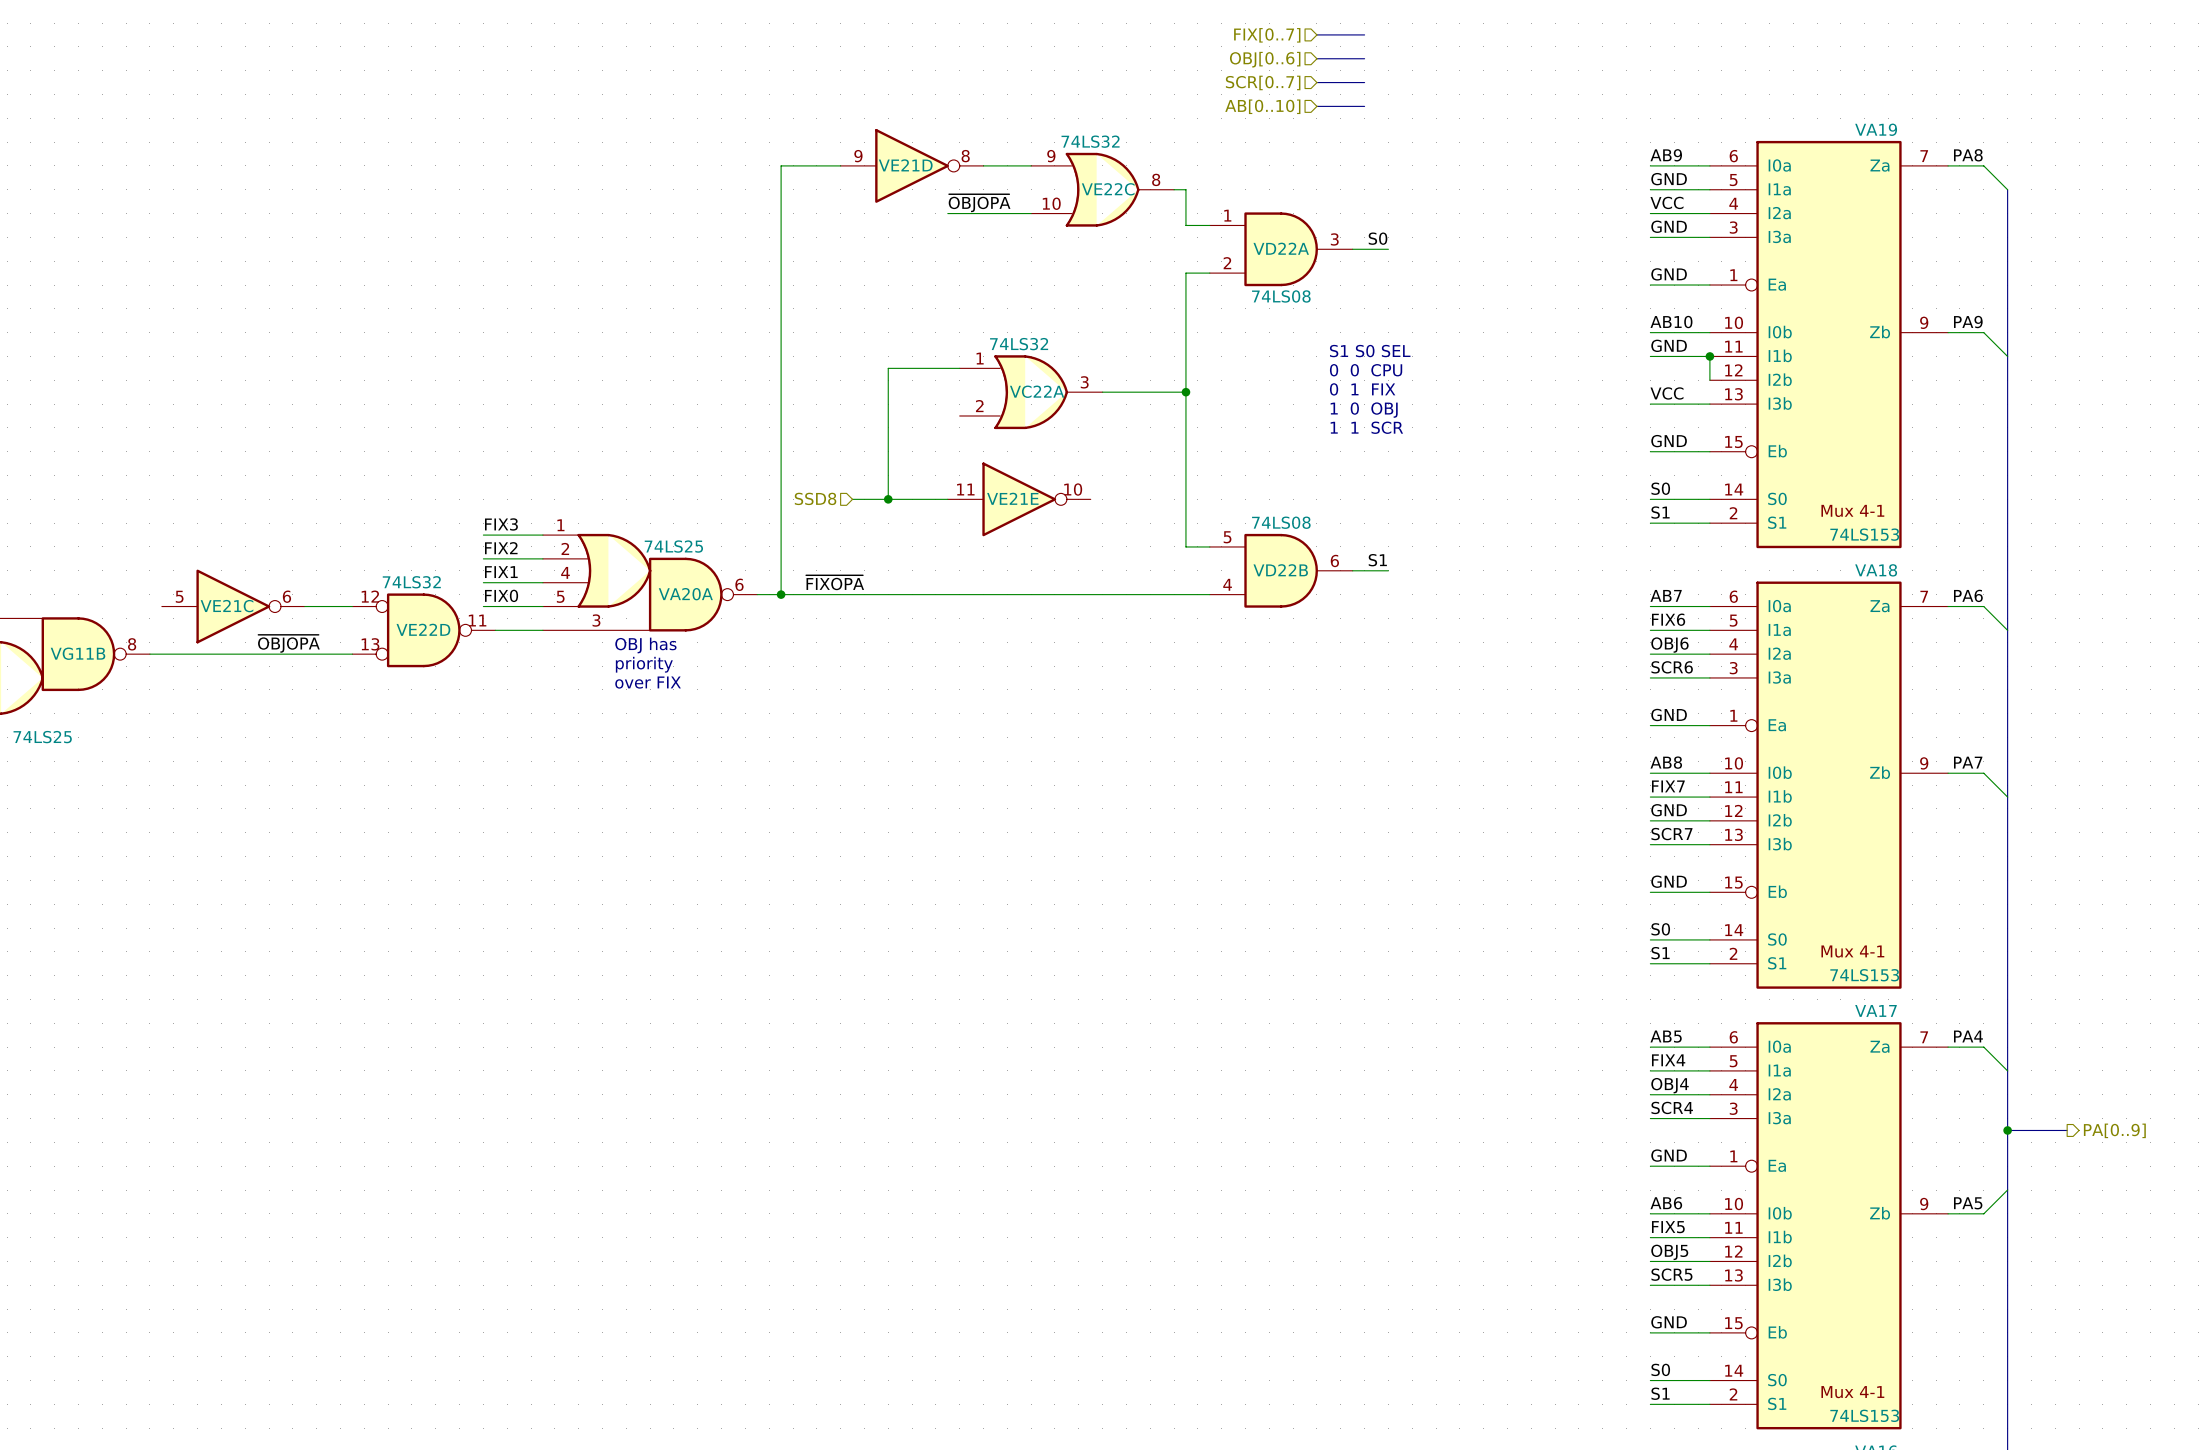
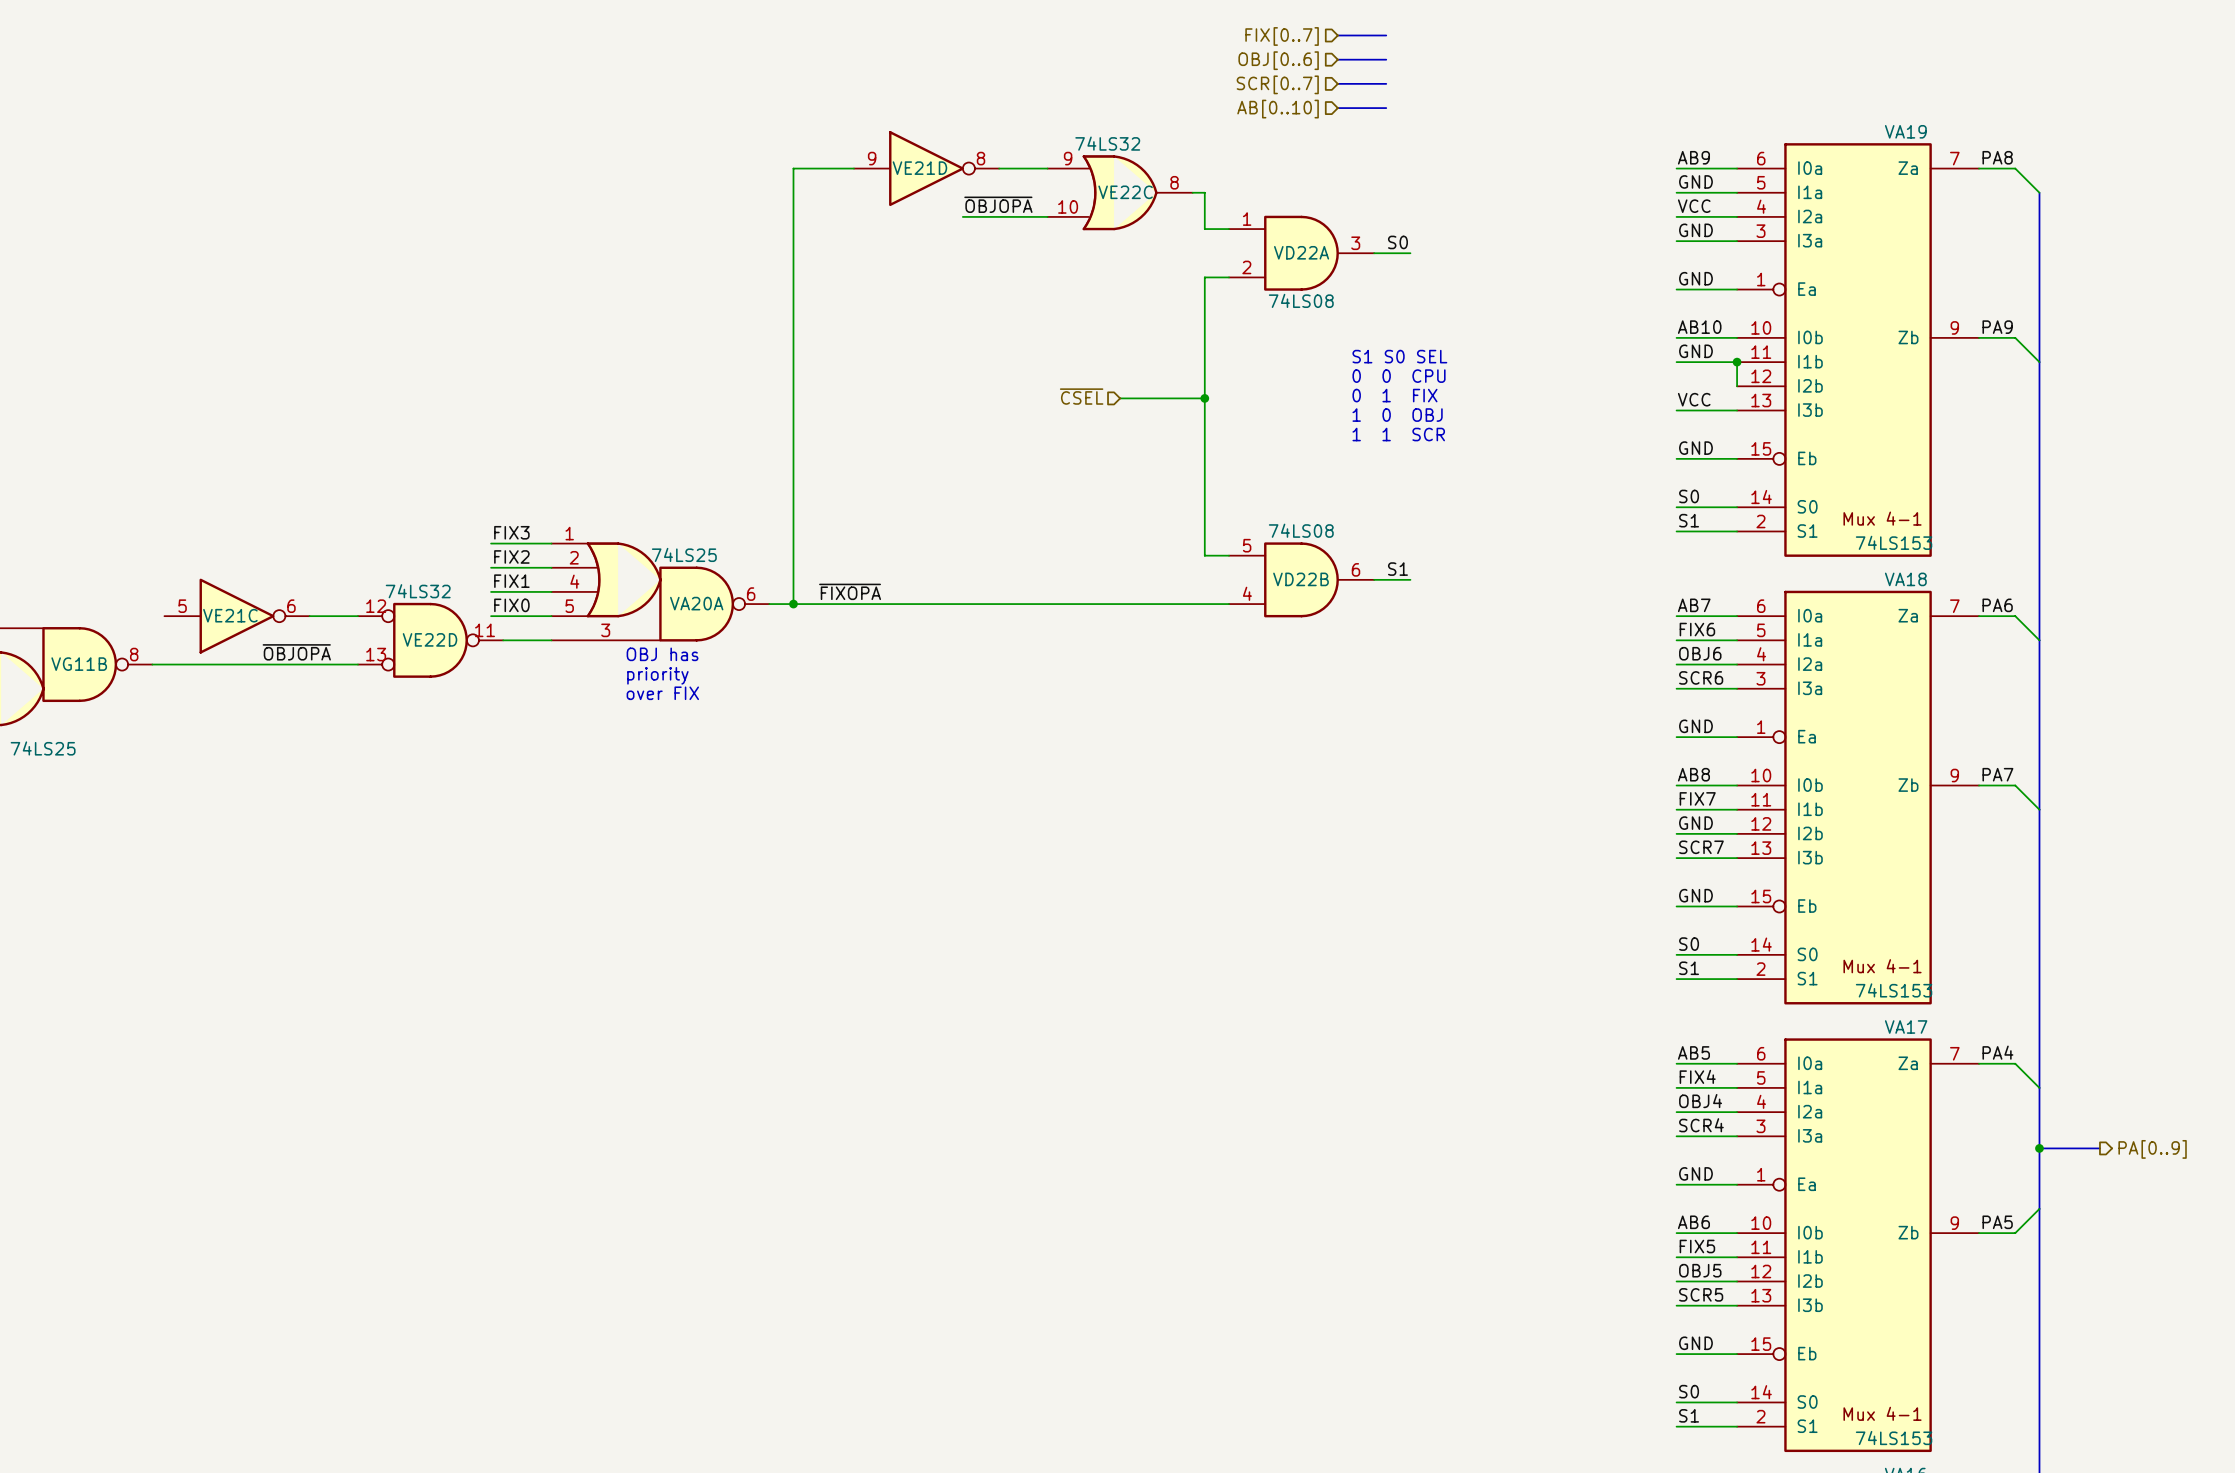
wire: (959, 368) (888, 368) (888, 499) -> none
hierarchical label: none -> ~{CSEL} (1081, 396)
VC22A: 74LS32 (1031, 392) -> none
hierarchical label: SSD8 (815, 498) -> none
wire: (852, 499) (947, 499) -> none
junction: (888, 499) -> none
VE21E: (1019, 499) -> none

